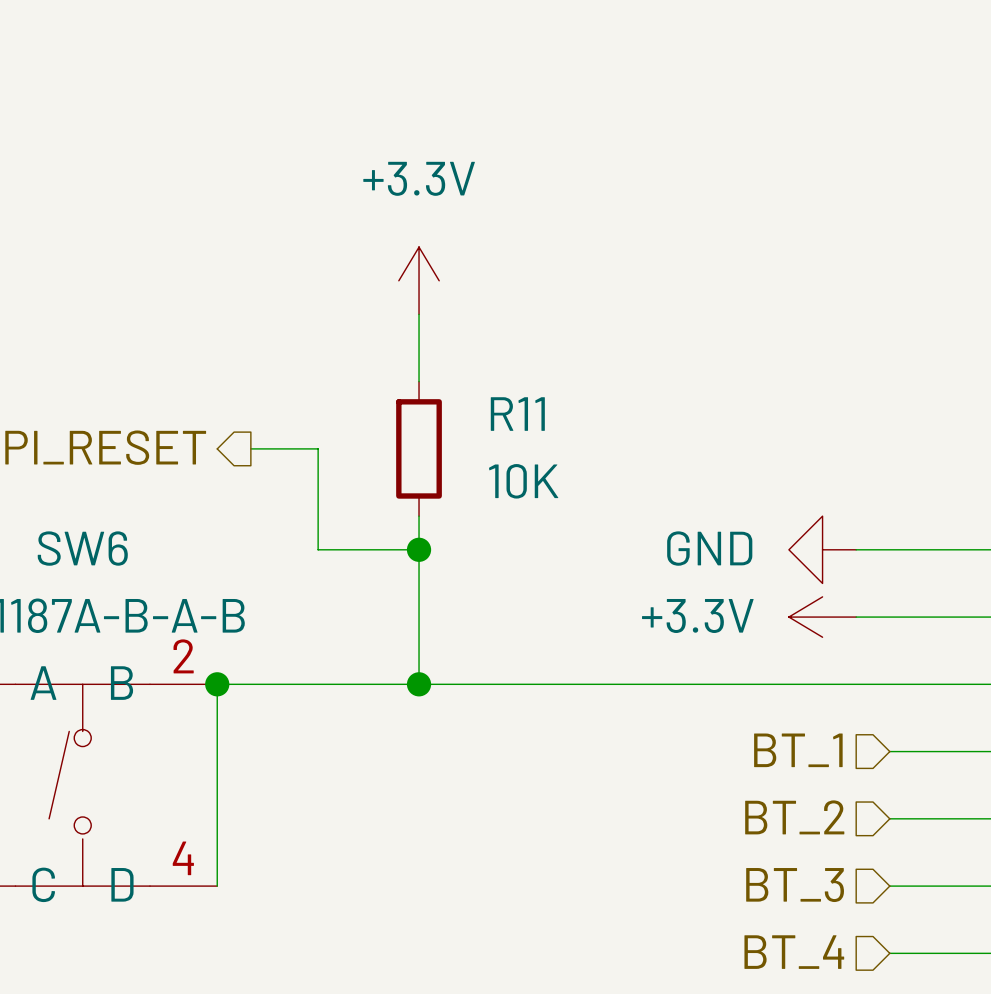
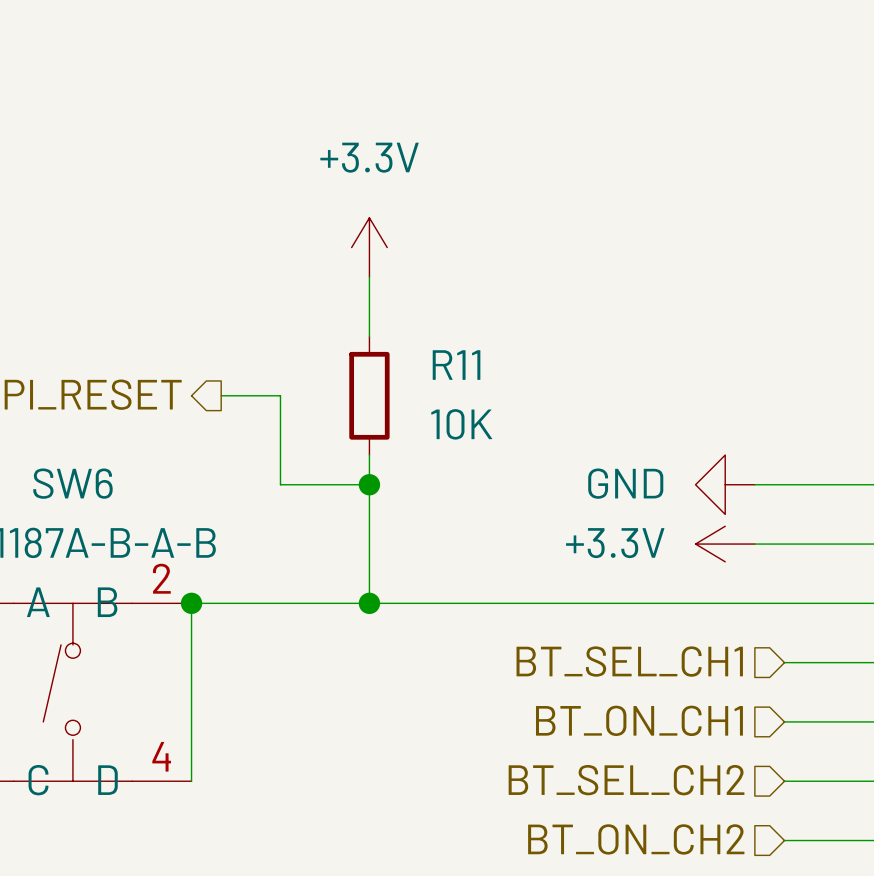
hierarchical label: BT_1 (798, 750) -> BT_SEL_CH1 (629, 661)
hierarchical label: BT_2 (794, 817) -> BT_ON_CH1 (639, 720)
hierarchical label: BT_3 (795, 885) -> BT_SEL_CH2 (626, 780)
hierarchical label: BT_4 (794, 952) -> BT_ON_CH2 (636, 839)

